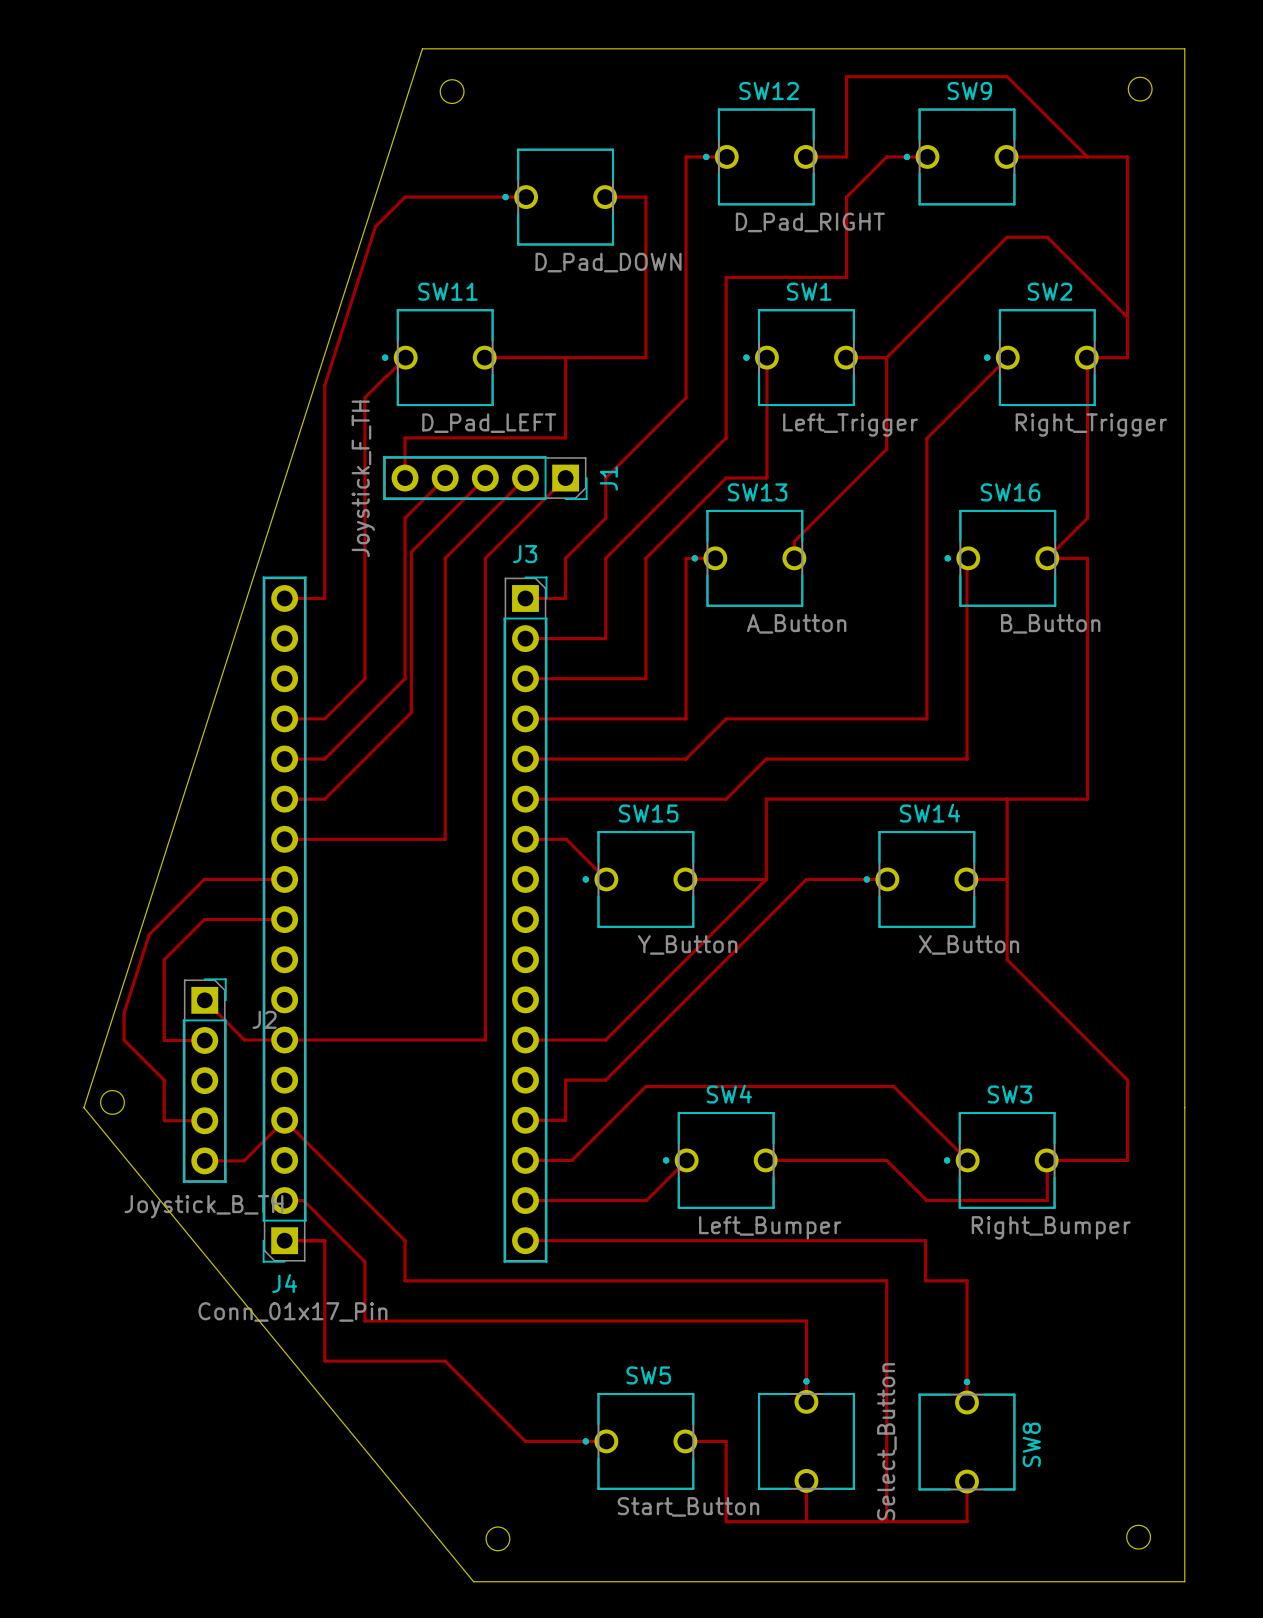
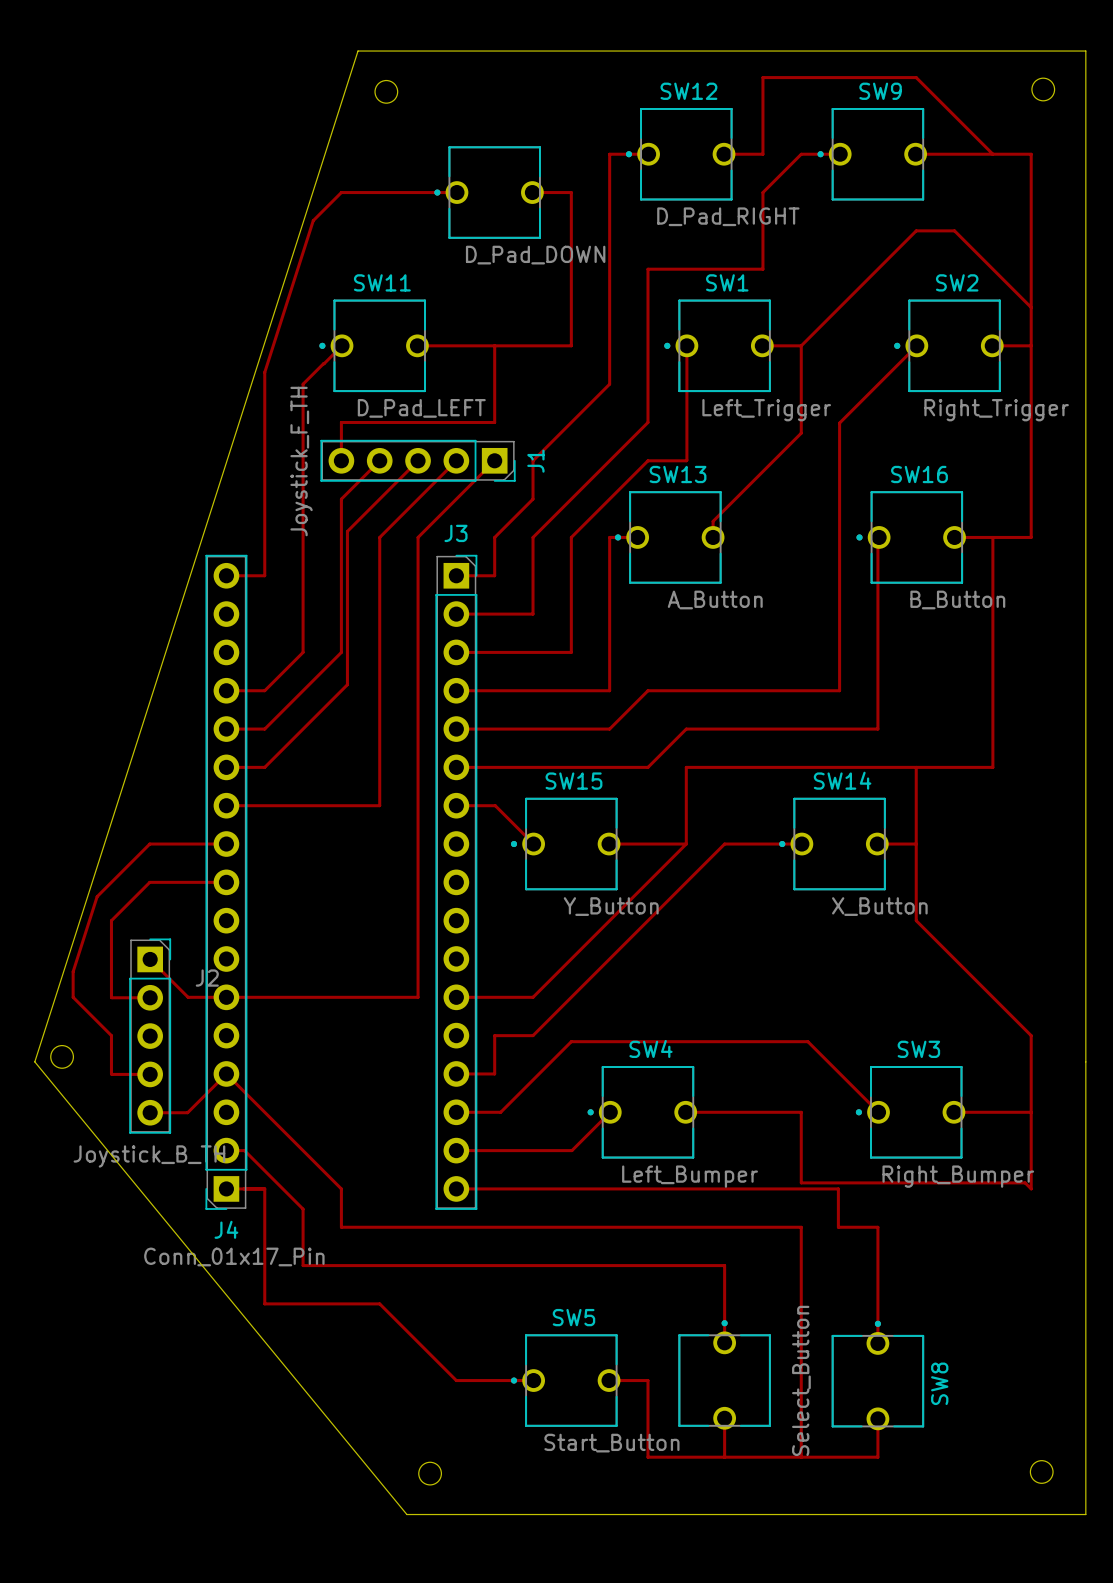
top track: (1087, 357) (1087, 518) (1047, 558) -> none
top track: none -> (1031, 345) (1031, 537) (992, 537)
top track: (886, 1160) (926, 1200) (1047, 1200) (1047, 1161) -> (801, 1112) (801, 1182) (1025, 1182) (1031, 1188) (1031, 1112)

